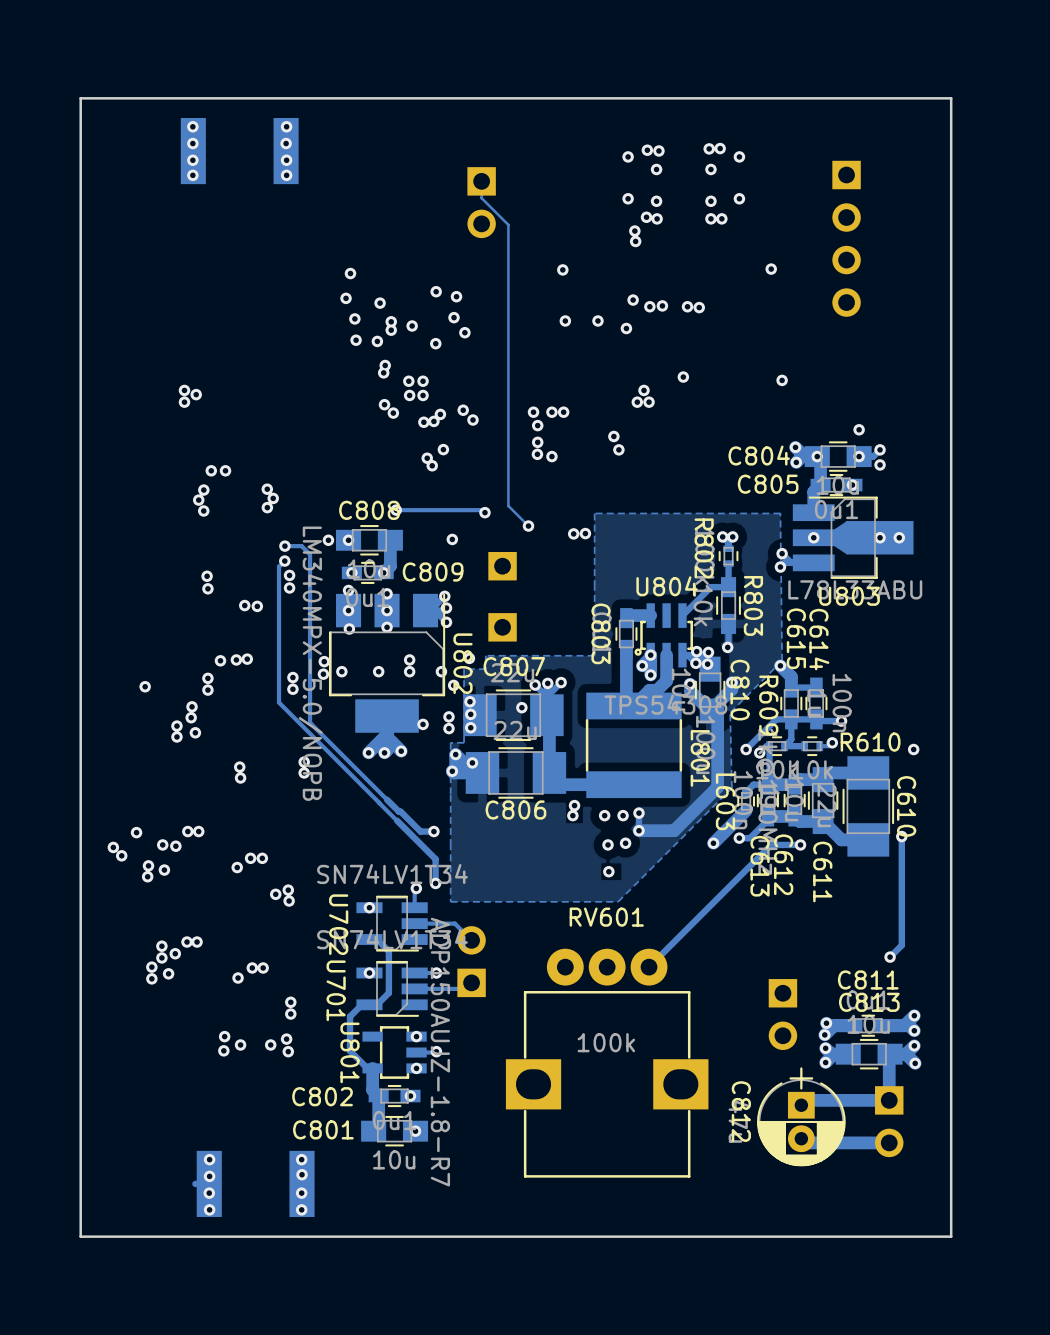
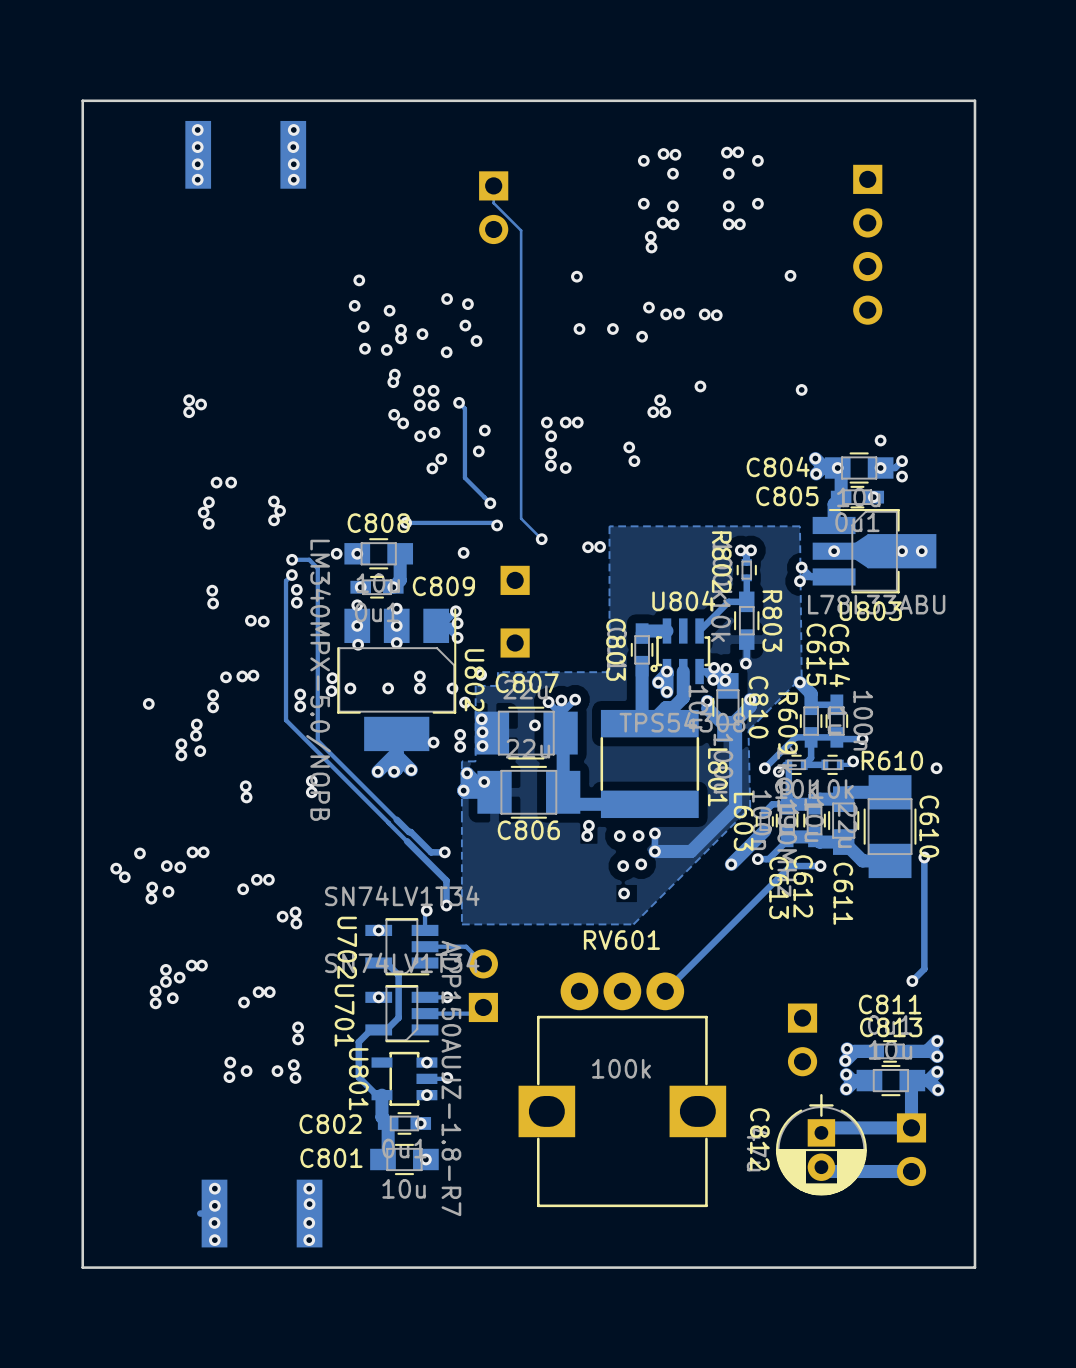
track: none -> (459, 402) (464, 408) (464, 477) (490, 503)
via: none -> (459, 402)
via: (463, 410) -> none
via: (440, 414) -> none
via: (433, 421) -> none
via: none -> (420, 436)
via: none -> (478, 451)
via: none -> (441, 459)
via: (443, 449) -> none
via: none -> (432, 468)
via: (427, 458) -> none
via: (432, 465) -> none
via: none -> (490, 503)

